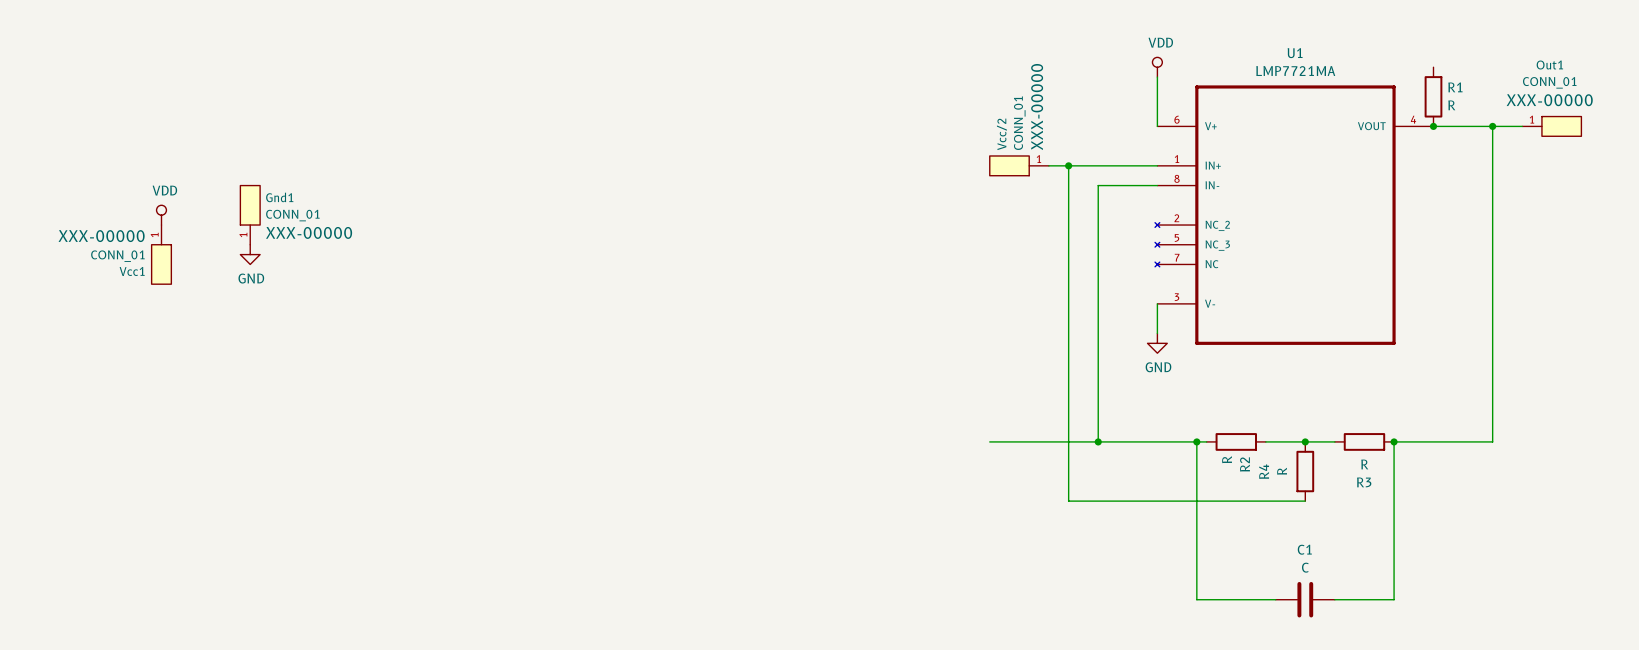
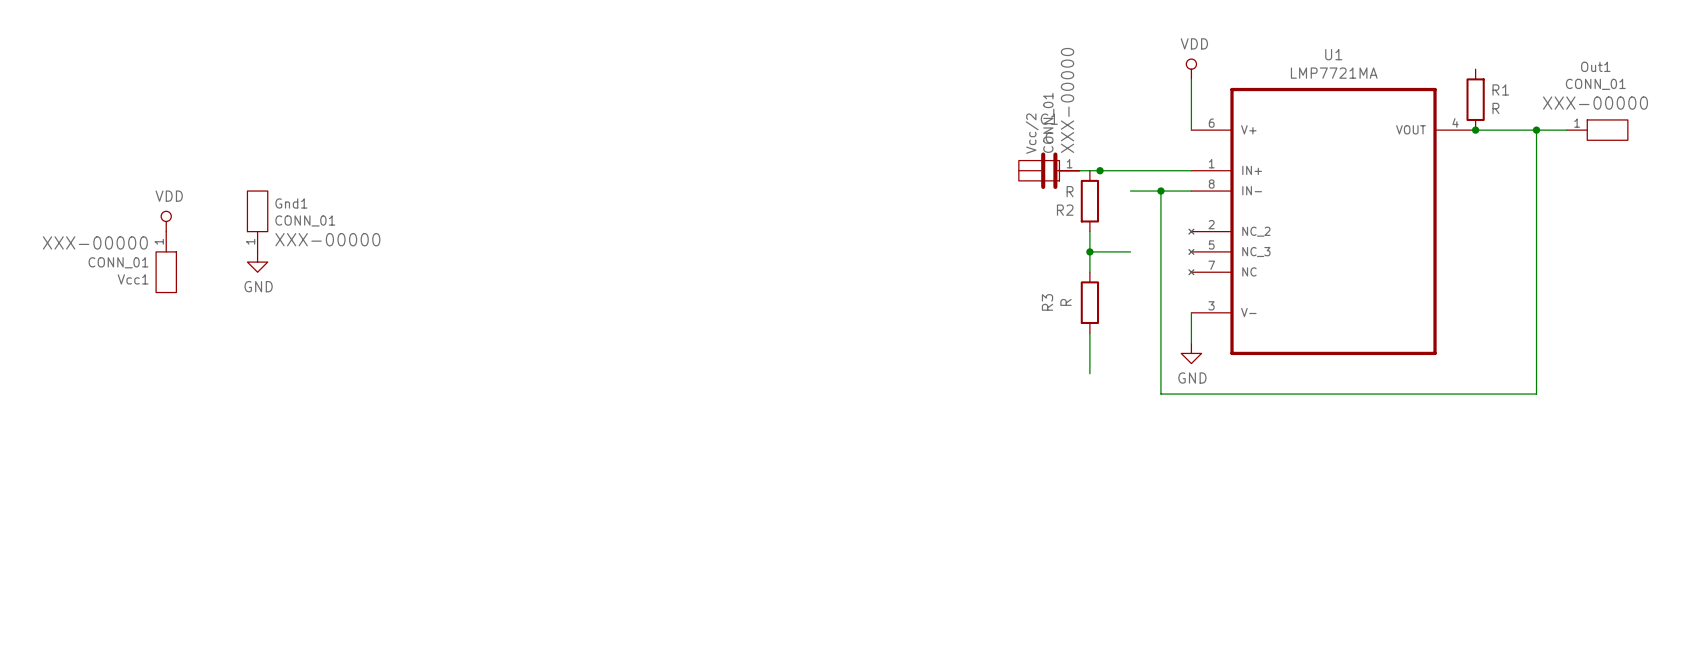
wire: (1068, 165) (1068, 501) (1305, 501) -> none
wire: (1098, 185) (1098, 441) -> none
junction: none -> (1160, 191)
wire: none -> (1089, 231) (1089, 272)
wire: none -> (1089, 251) (1130, 251)
junction: none -> (1089, 251)
wire: none -> (1089, 333) (1089, 373)
wire: (1492, 382) (1492, 441) (1394, 441) (1394, 599) (1334, 599) -> (1536, 394) (1160, 394) (1160, 191)
wire: (989, 441) (1206, 441) -> none
junction: (1098, 441) -> none
wire: (1196, 441) (1196, 599) (1275, 599) -> none
junction: (1196, 441) -> none
R2 rotation: 0° (1236, 441) -> 90° clockwise (1089, 201)
R2 position: (1236, 441) -> (1089, 201)
wire: (1265, 441) (1334, 441) -> none
junction: (1305, 441) -> none
R3 rotation: 0° (1364, 441) -> 90° clockwise (1089, 302)
R3 position: (1364, 441) -> (1089, 302)
junction: (1394, 441) -> none
R4: R (1305, 471) -> none
C1 position: (1305, 599) -> (1049, 170)

